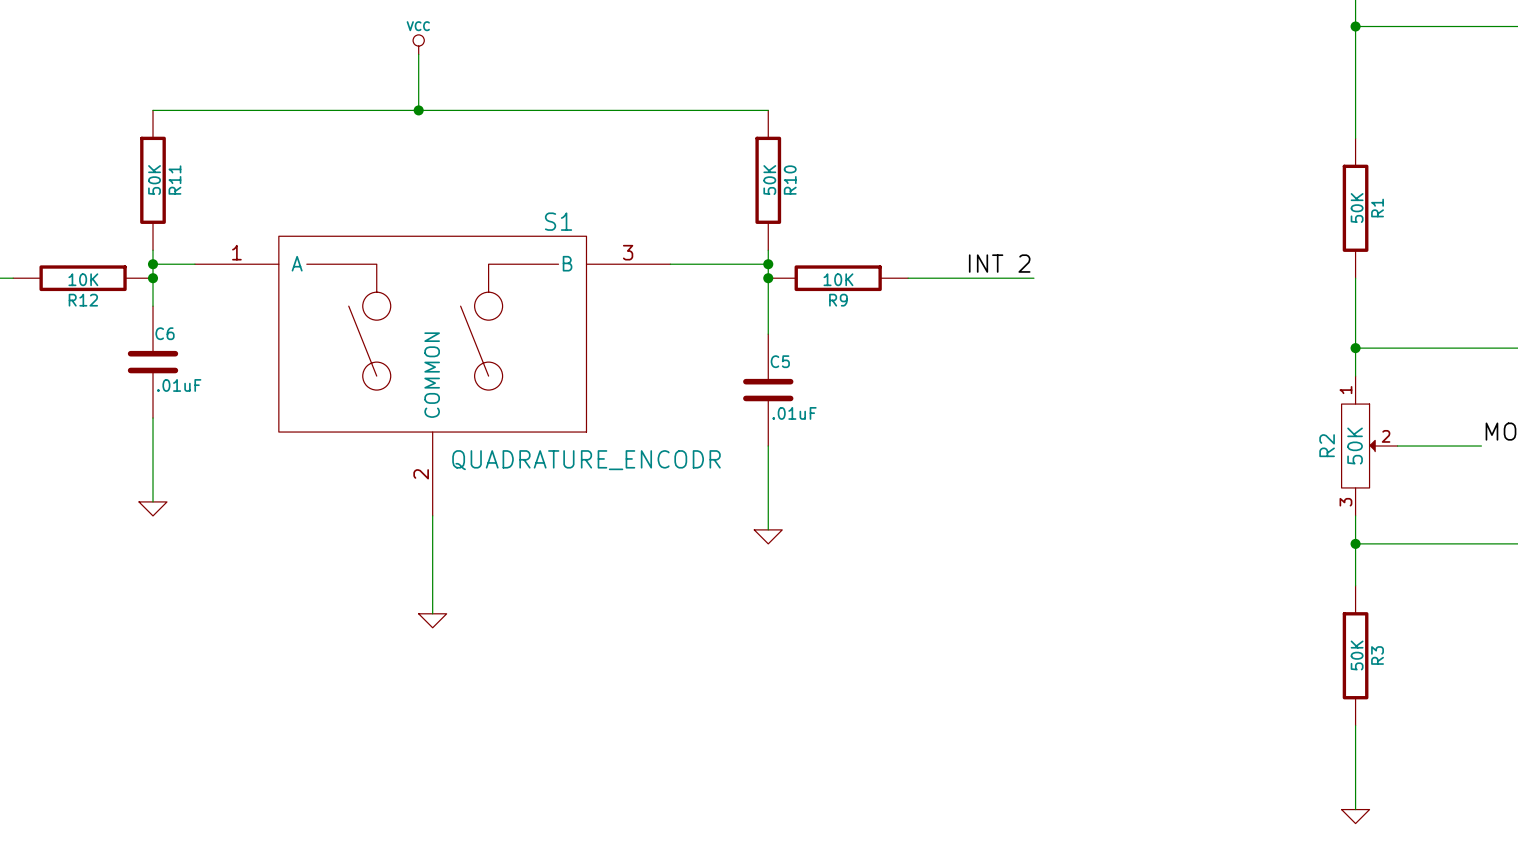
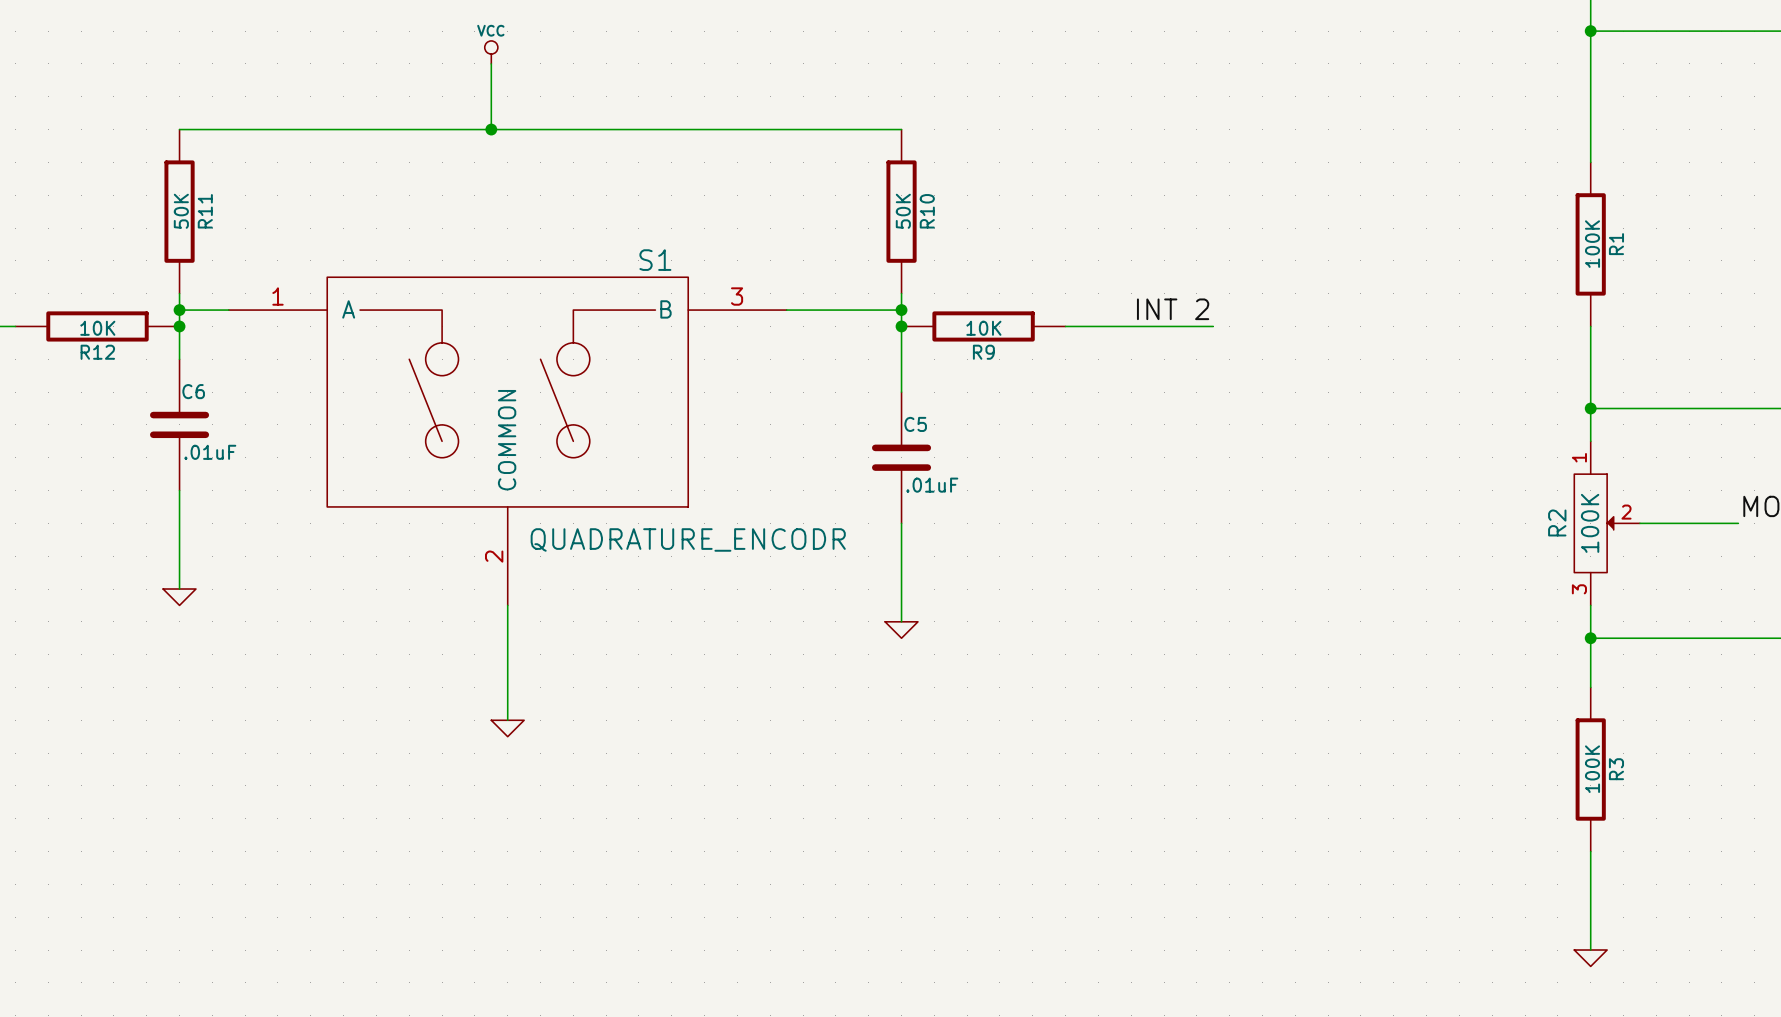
R1 value: 50K (1357, 208) -> 100K (1592, 244)
R2 value: 50K (1355, 446) -> 100K (1590, 523)
R3 value: 50K (1357, 655) -> 100K (1592, 769)

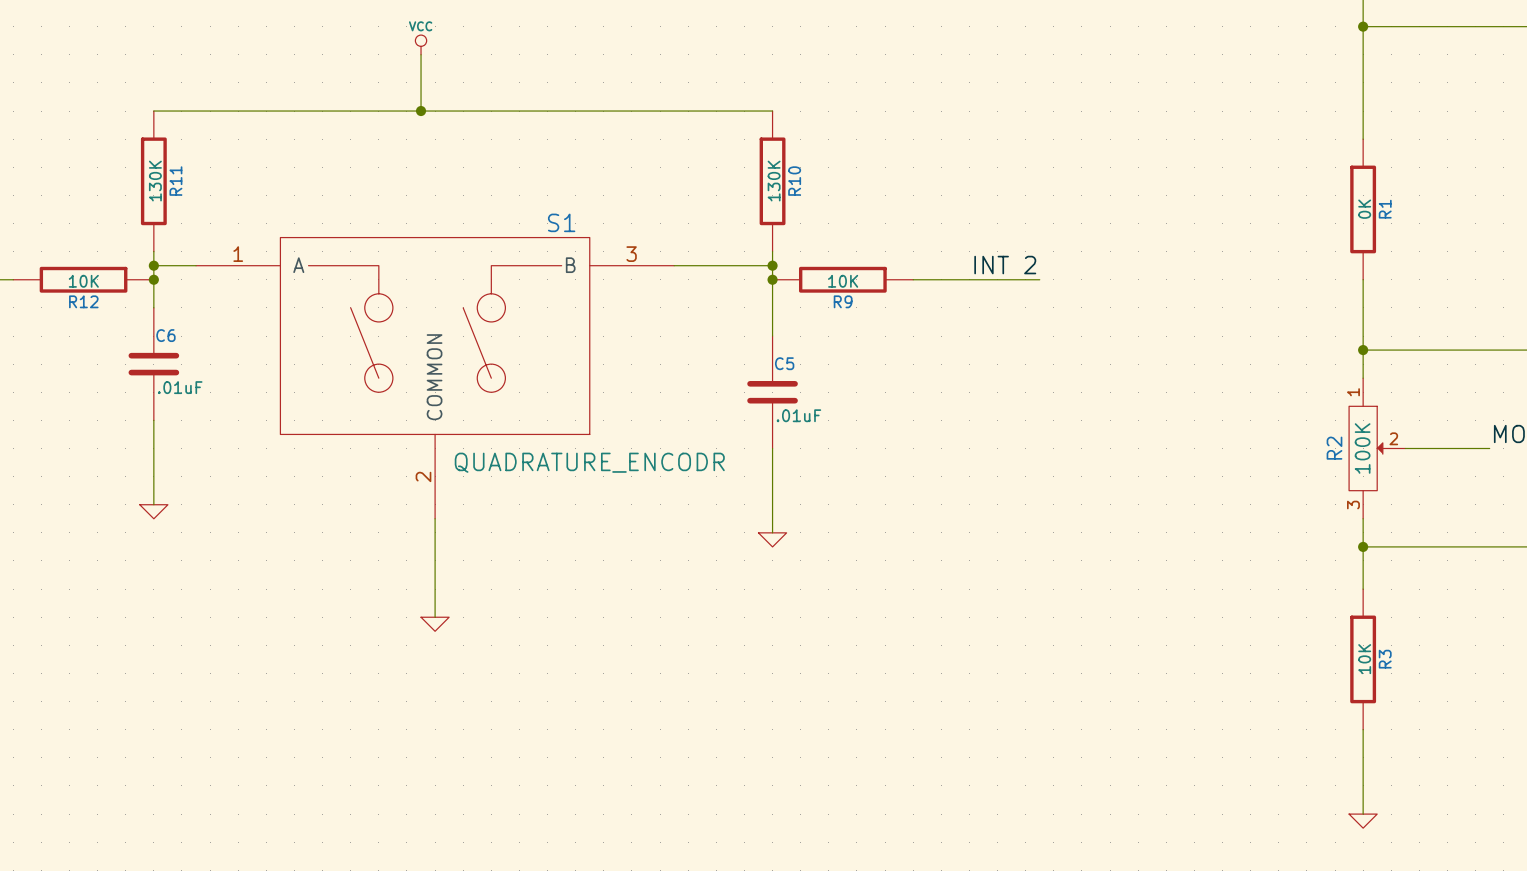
R11 value: 50K (181, 211) -> 130K (155, 181)
R10 value: 50K (903, 211) -> 130K (774, 181)
R1 value: 100K (1592, 244) -> 0K (1364, 209)
R3 value: 100K (1592, 769) -> 10K (1364, 659)

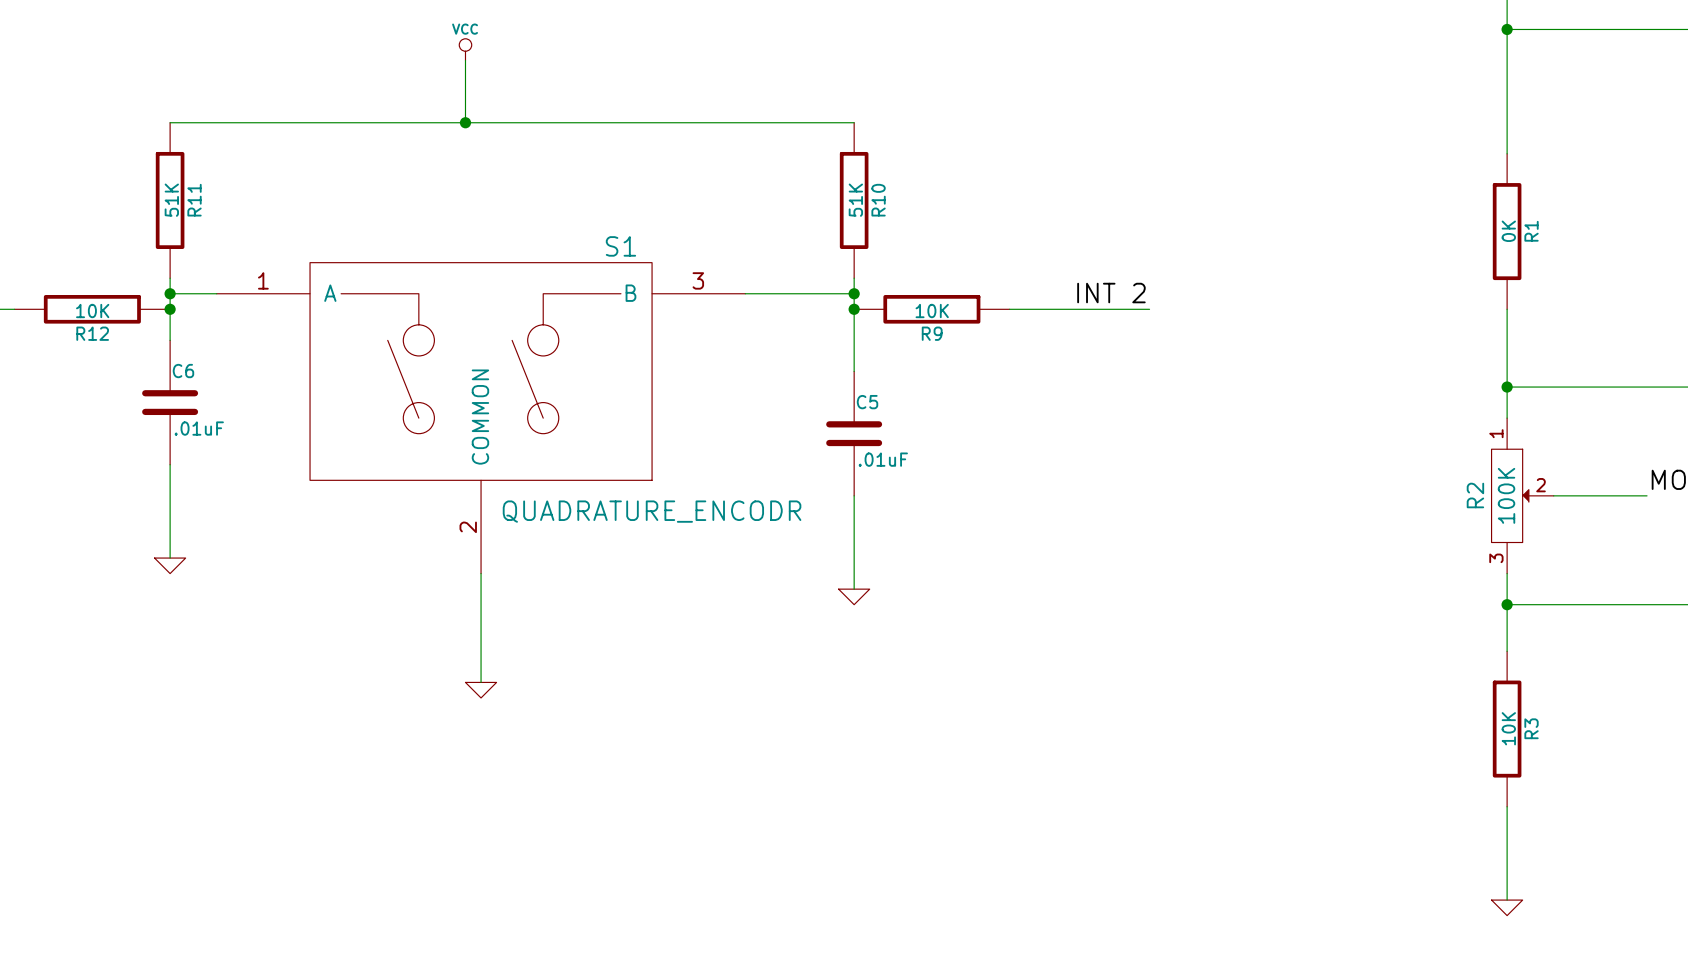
R11 value: 130K (155, 181) -> 51K (171, 200)
R10 value: 130K (774, 181) -> 51K (855, 200)

